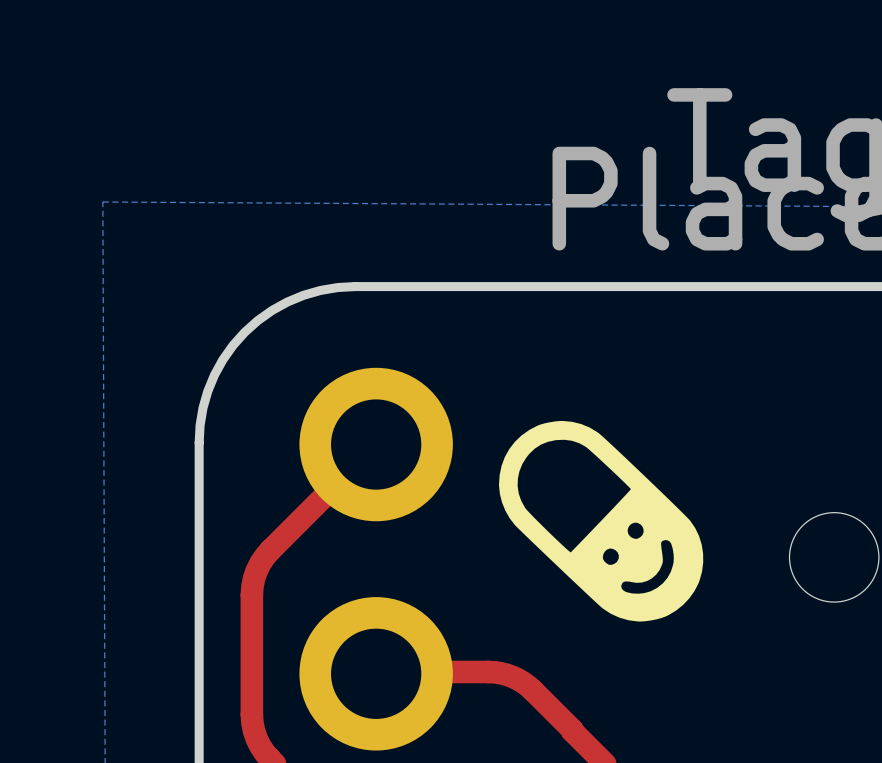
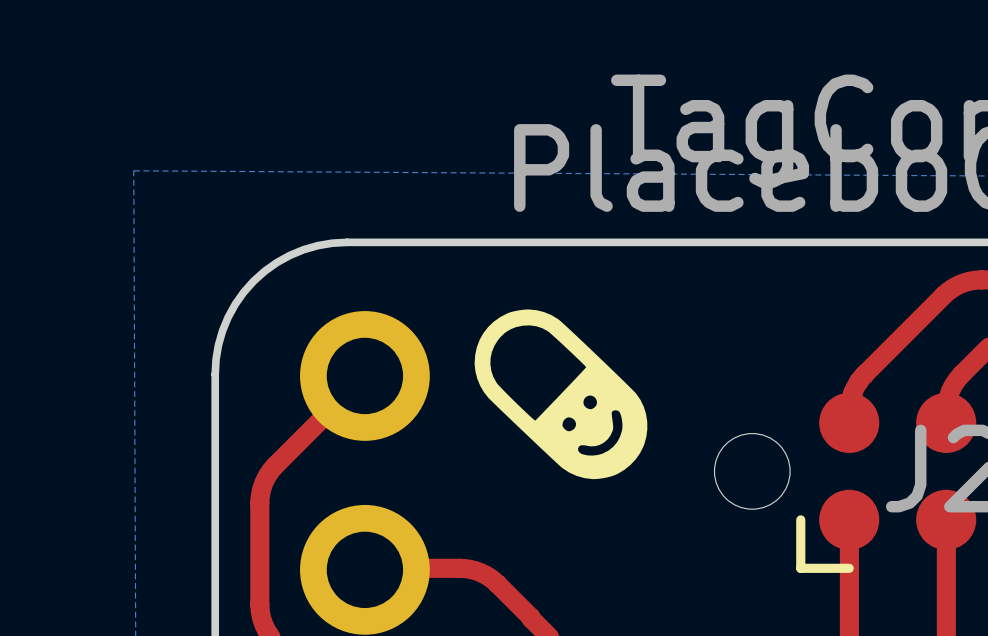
drawing position: (601, 521) -> (560, 394)

